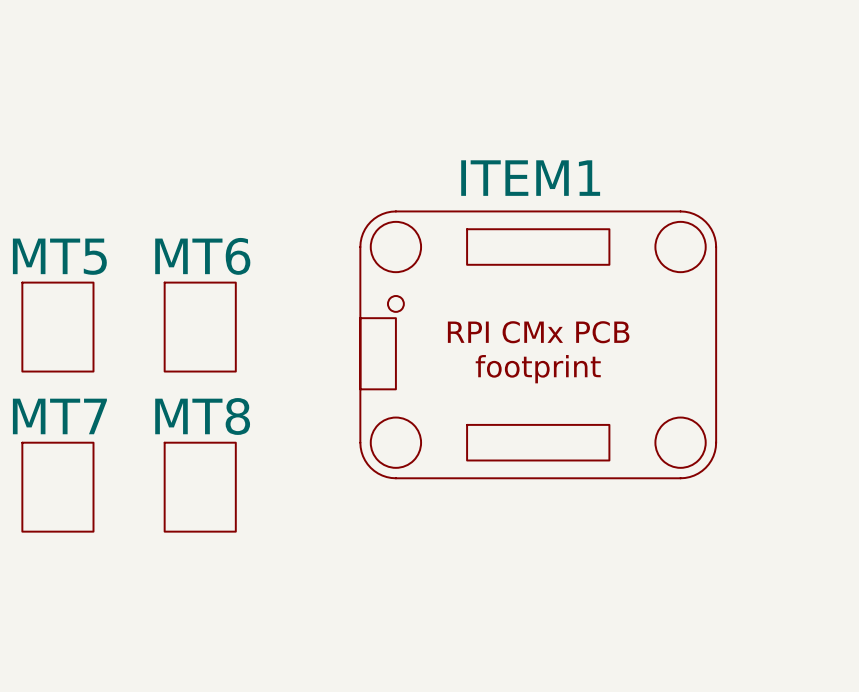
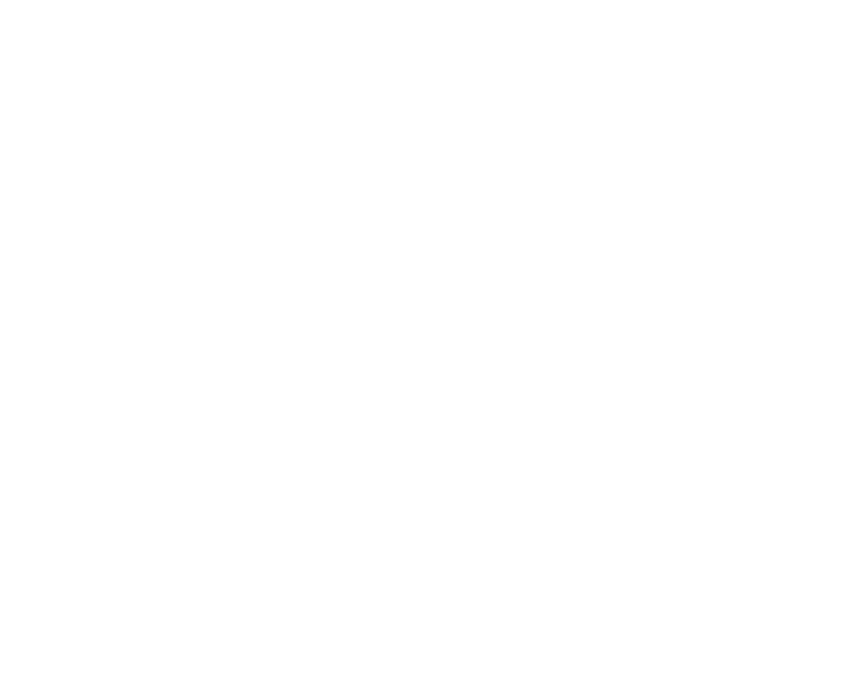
MT5: (57, 327) -> none
MT6: (200, 327) -> none
ITEM1: (538, 344) -> none
MT7: (57, 487) -> none
MT8: (200, 487) -> none

